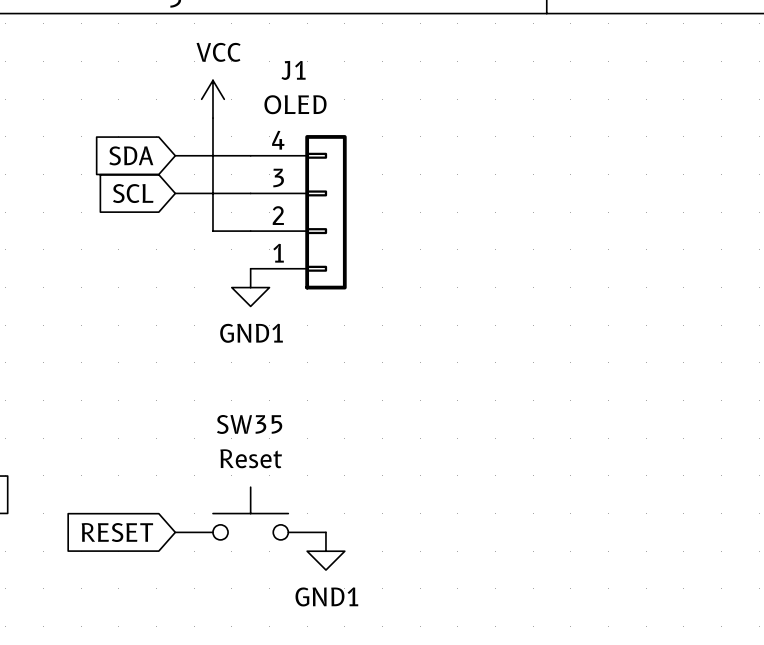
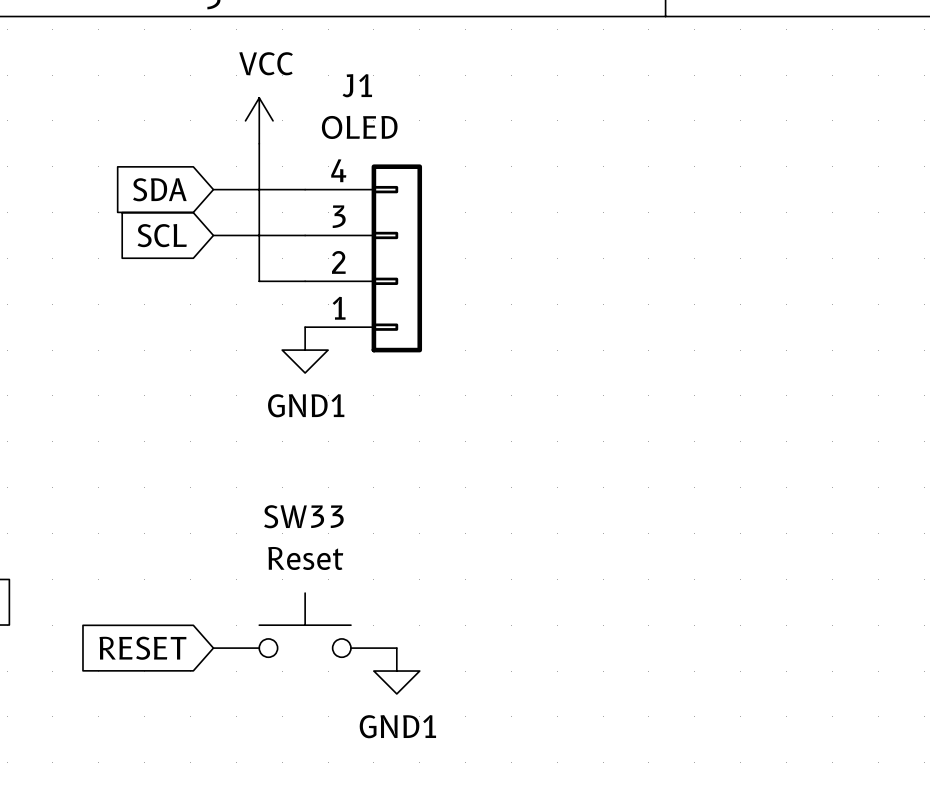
SW35 name: SW35 (249, 424) -> SW33 (303, 516)

